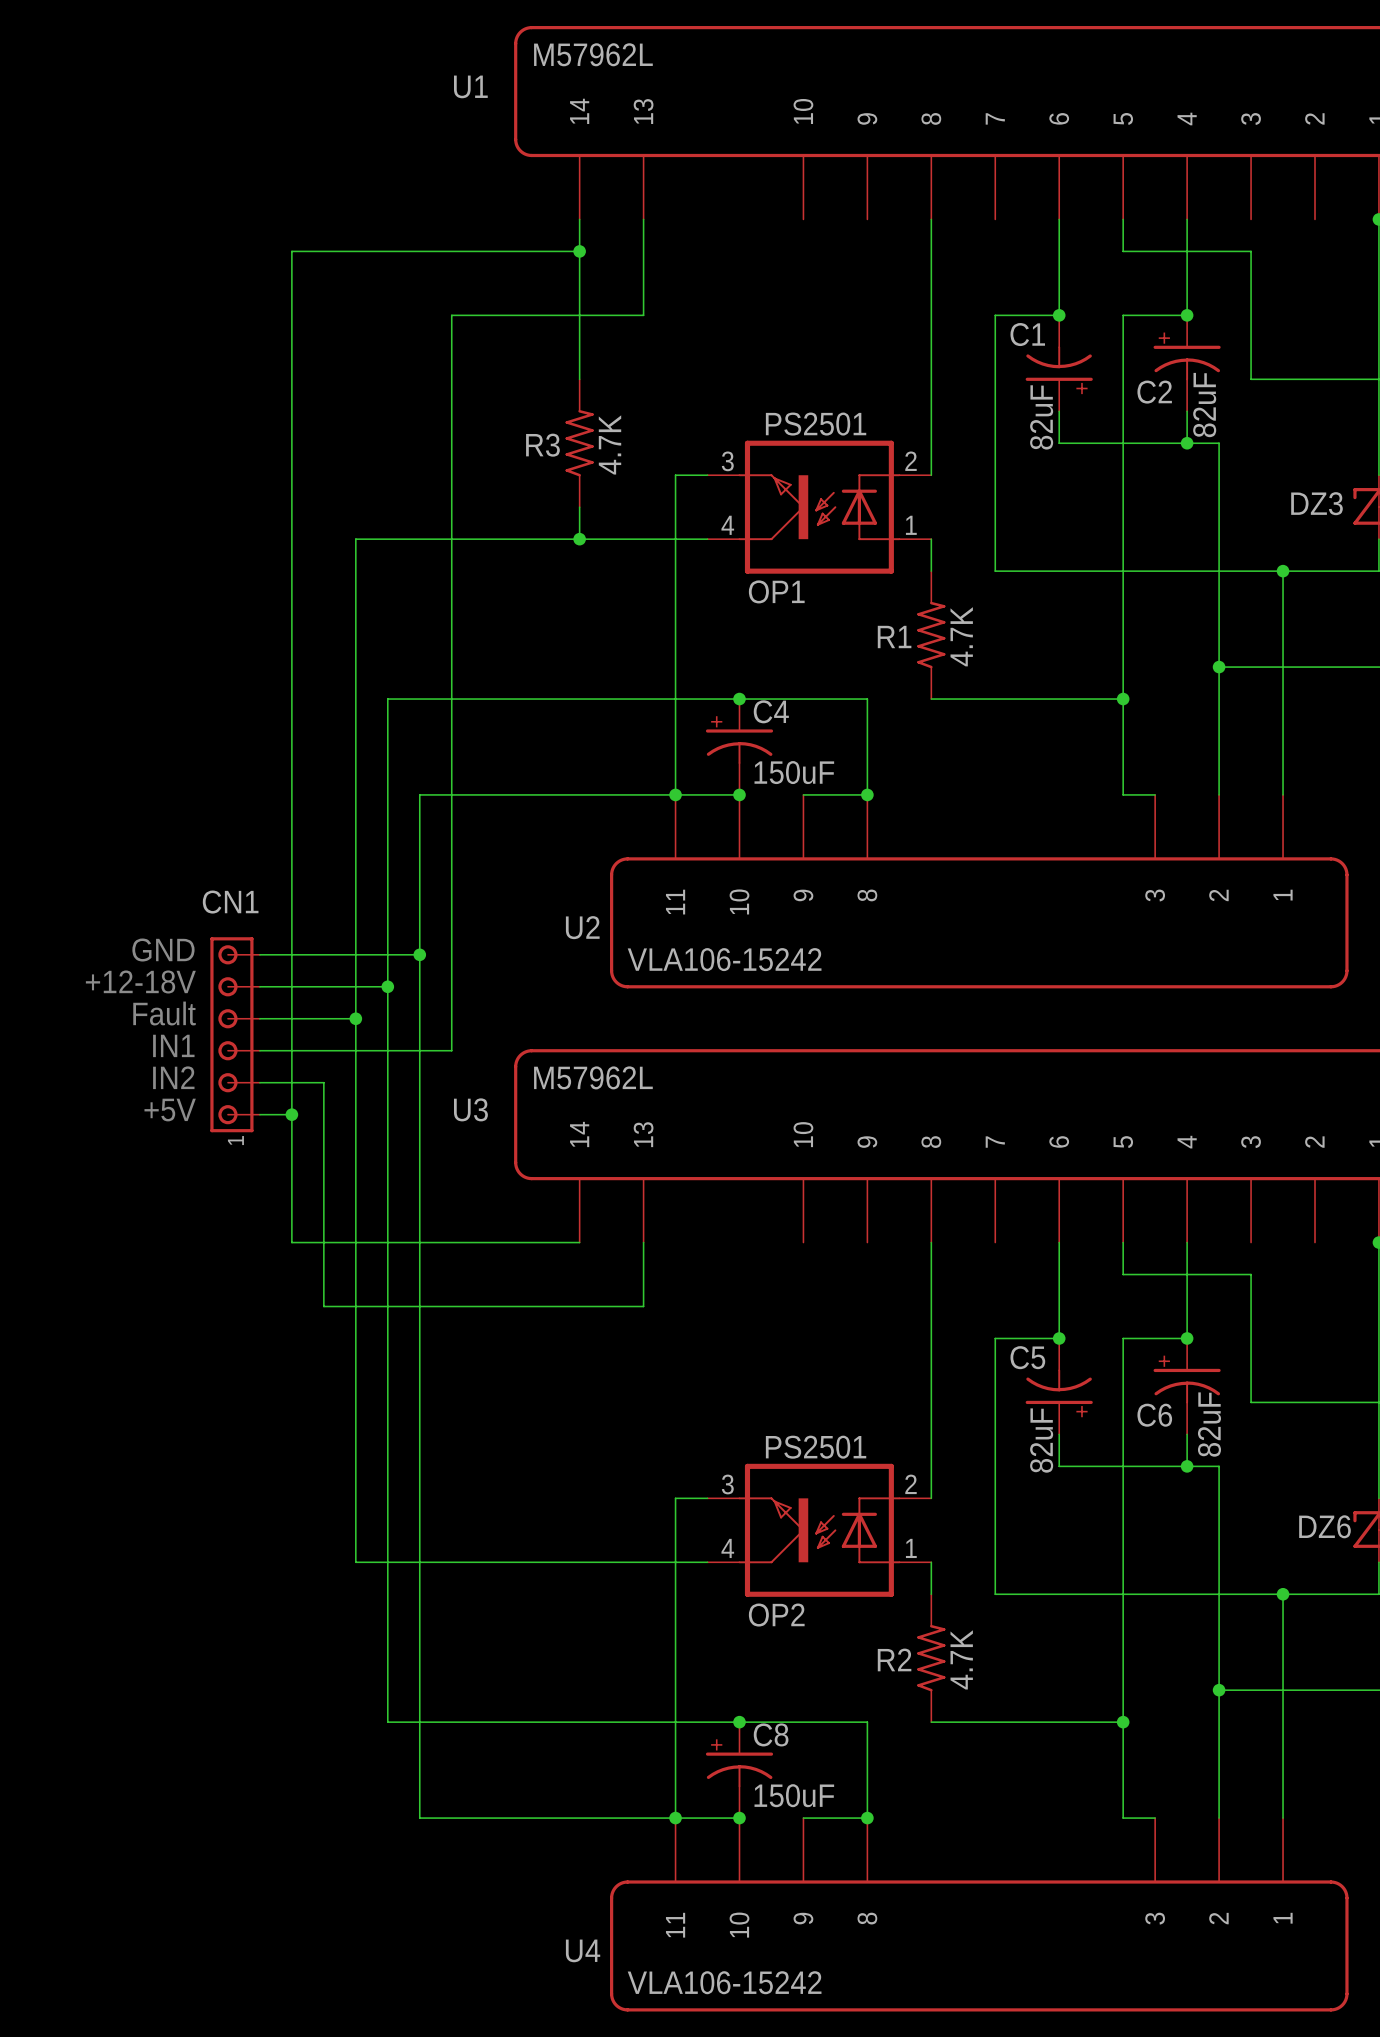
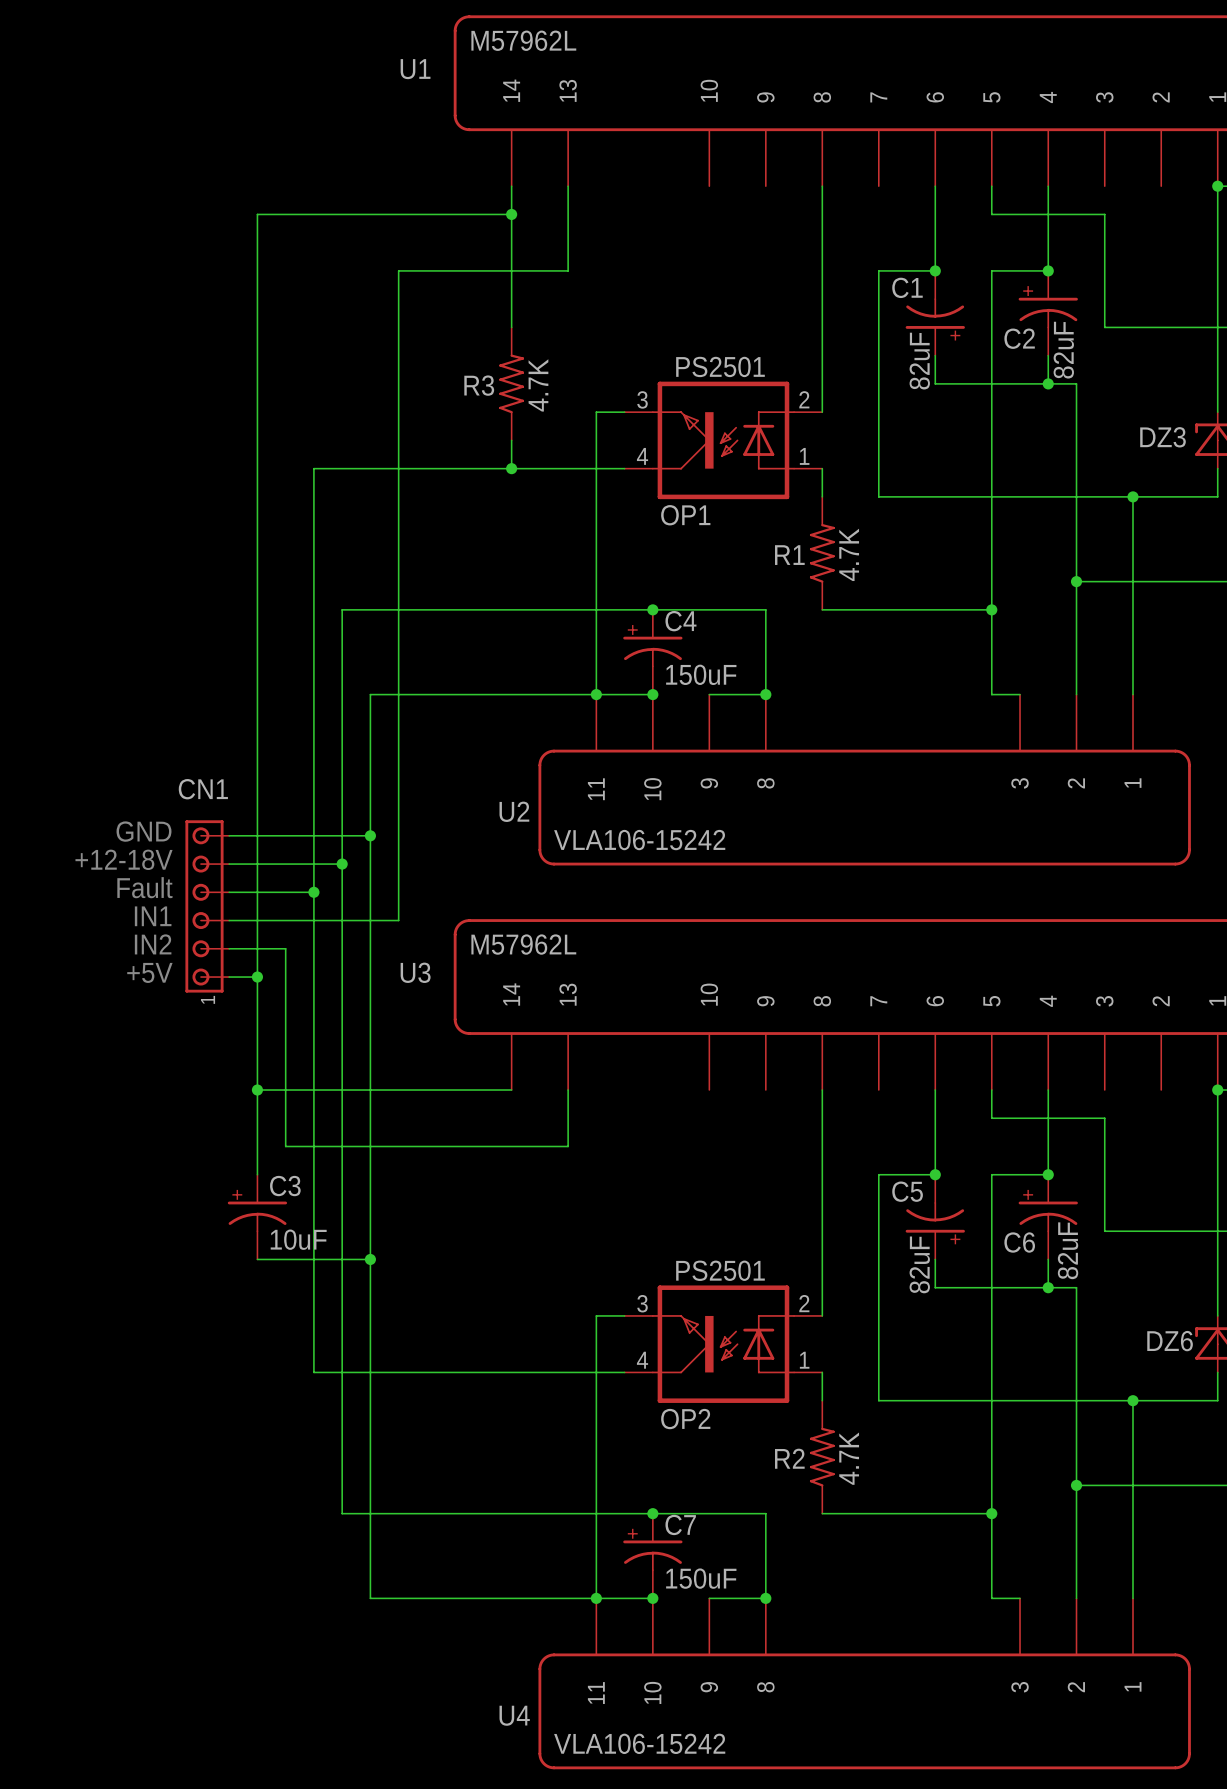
wire: none -> (257, 1090) (257, 1174)
junction: none -> (257, 1090)
C3: none -> 10uF (257, 1217)
wire: none -> (257, 1259) (370, 1259)
junction: none -> (370, 1259)
C8 name: C8 (771, 1734) -> C7 (680, 1524)

